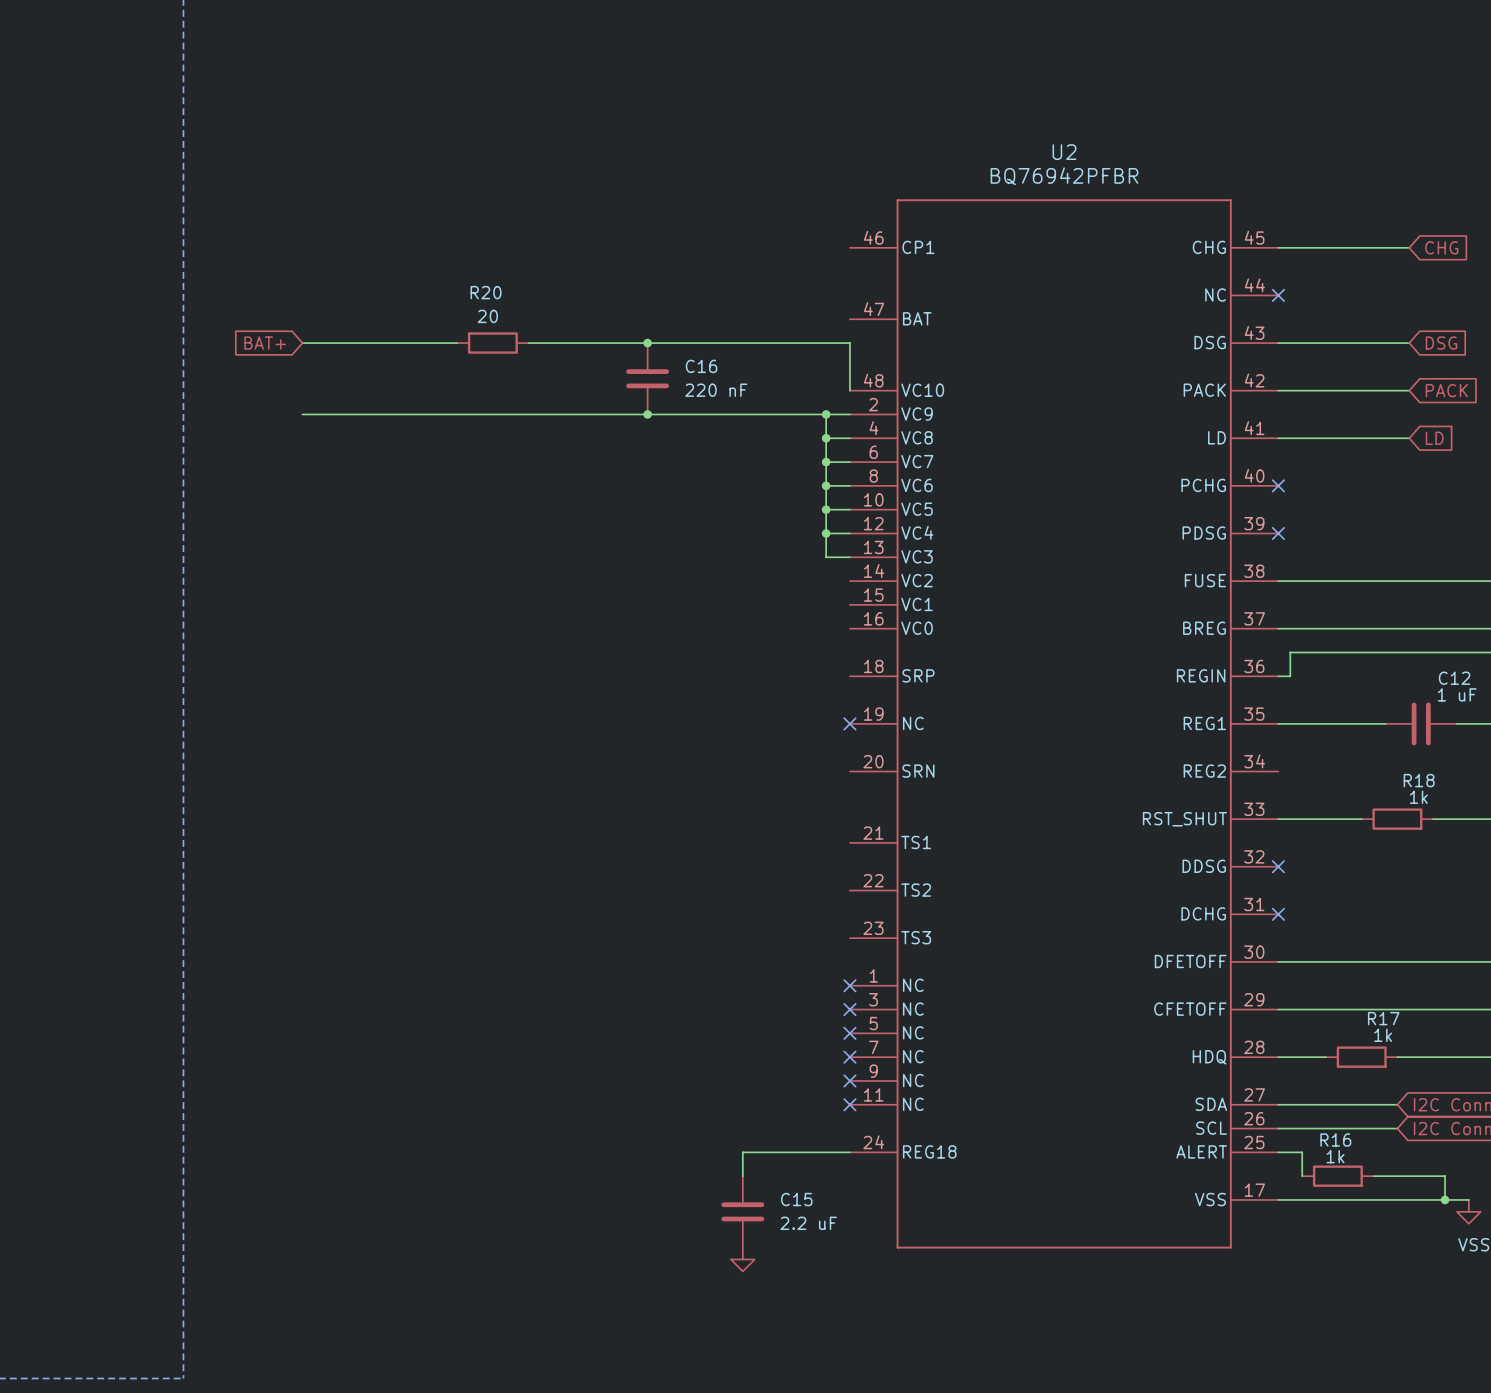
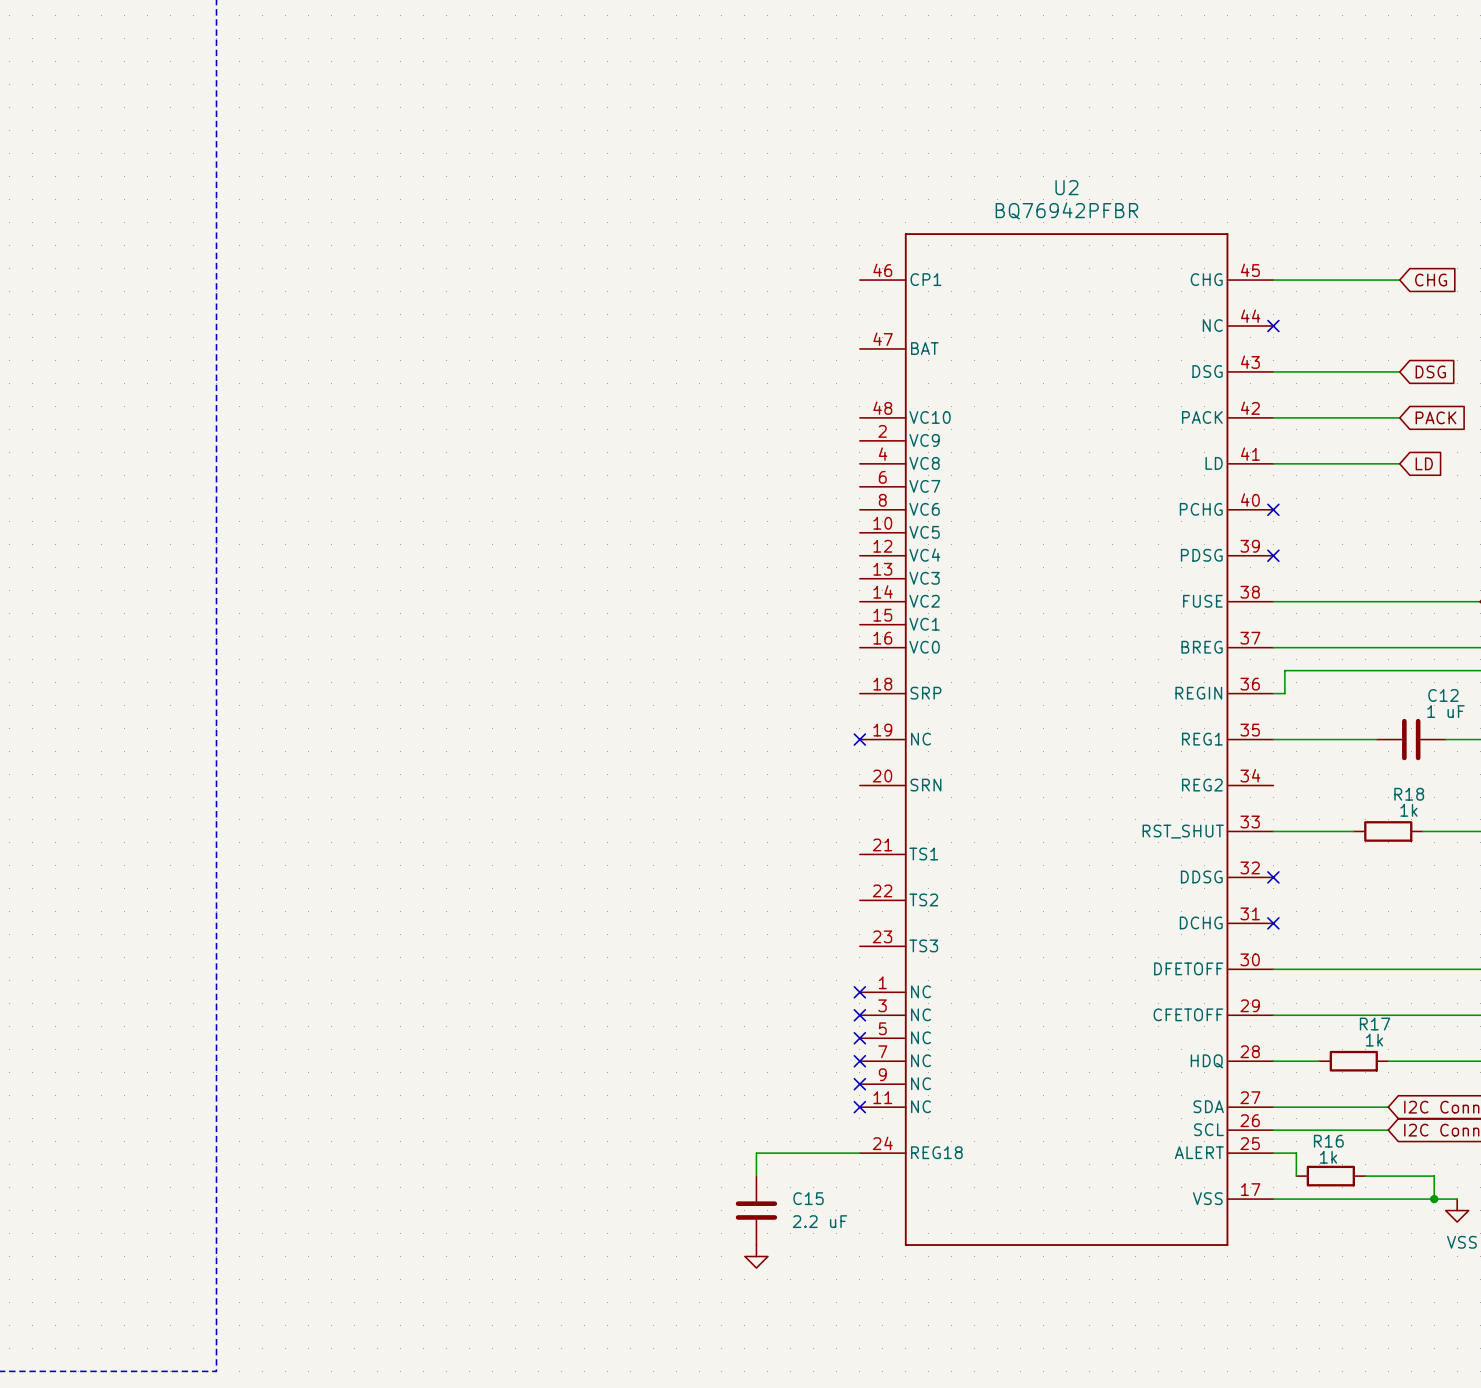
global label: BAT+ (265, 343) -> none
wire: (302, 343) (457, 343) -> none
R20: 20 (492, 343) -> none
wire: (528, 343) (849, 343) (849, 390) -> none
junction: (647, 343) -> none
C16: 220 nF (647, 378) -> none
wire: (302, 414) (849, 414) -> none
junction: (647, 414) -> none
wire: (826, 414) (826, 557) (849, 557) -> none
junction: (826, 414) -> none
wire: (826, 438) (849, 438) -> none
junction: (826, 438) -> none
wire: (826, 462) (849, 462) -> none
junction: (826, 462) -> none
wire: (826, 485) (849, 485) -> none
junction: (826, 485) -> none
wire: (826, 509) (849, 509) -> none
junction: (826, 509) -> none
wire: (826, 533) (849, 533) -> none
junction: (826, 533) -> none

